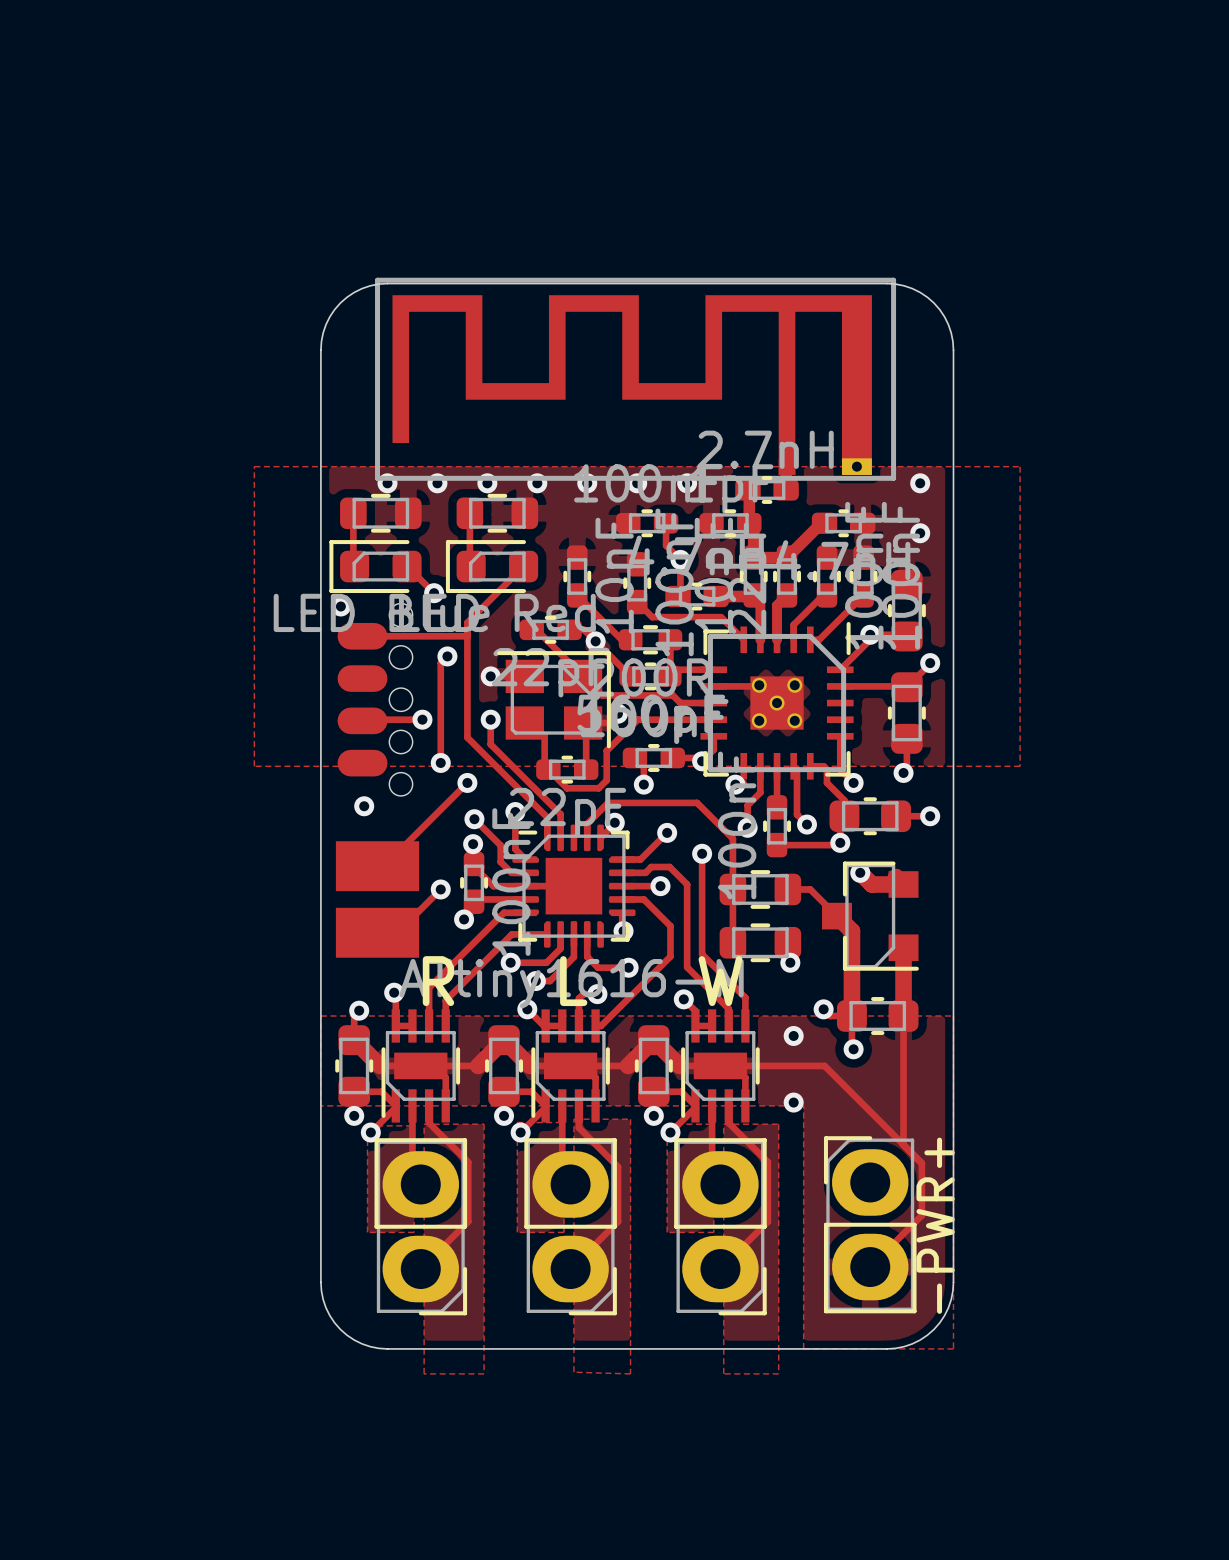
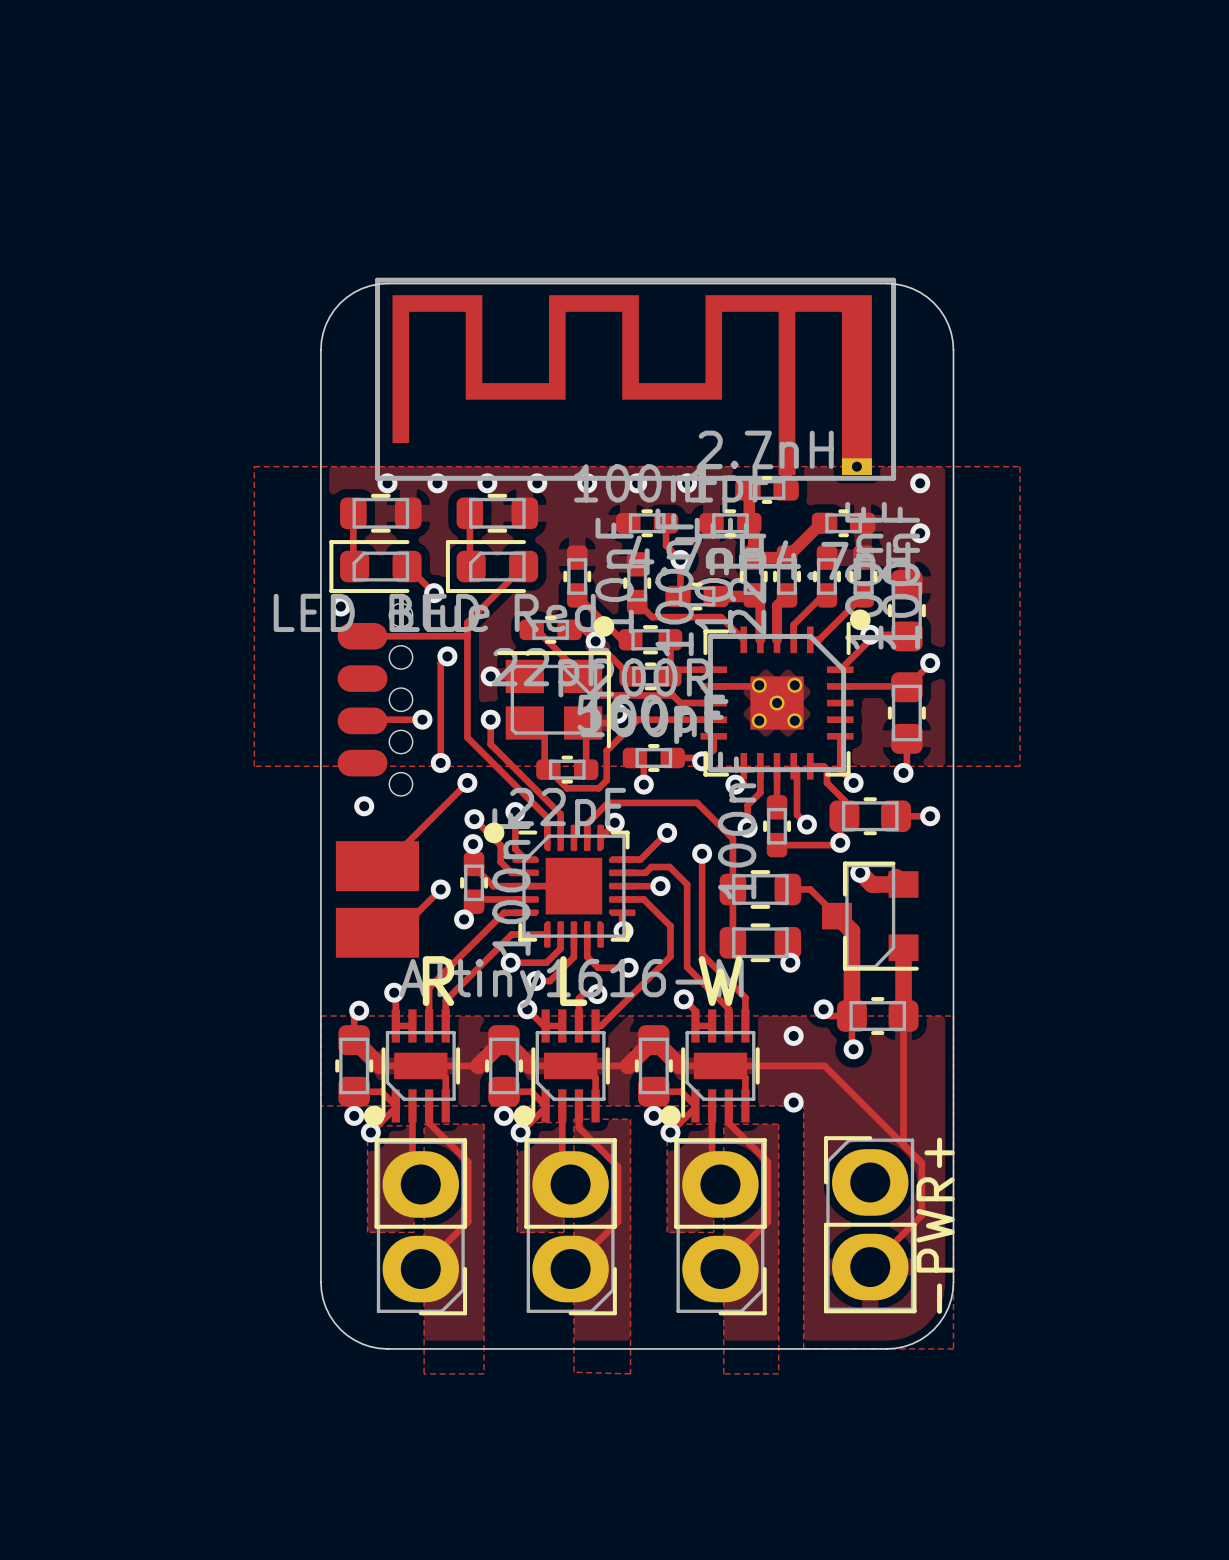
drawing: none -> [849, 609, 871, 631]
drawing: none -> [593, 616, 615, 637]
drawing: none -> [483, 822, 505, 844]
drawing: none -> [363, 1105, 385, 1127]
drawing: none -> [513, 1105, 535, 1127]
drawing: none -> [660, 1105, 681, 1127]

